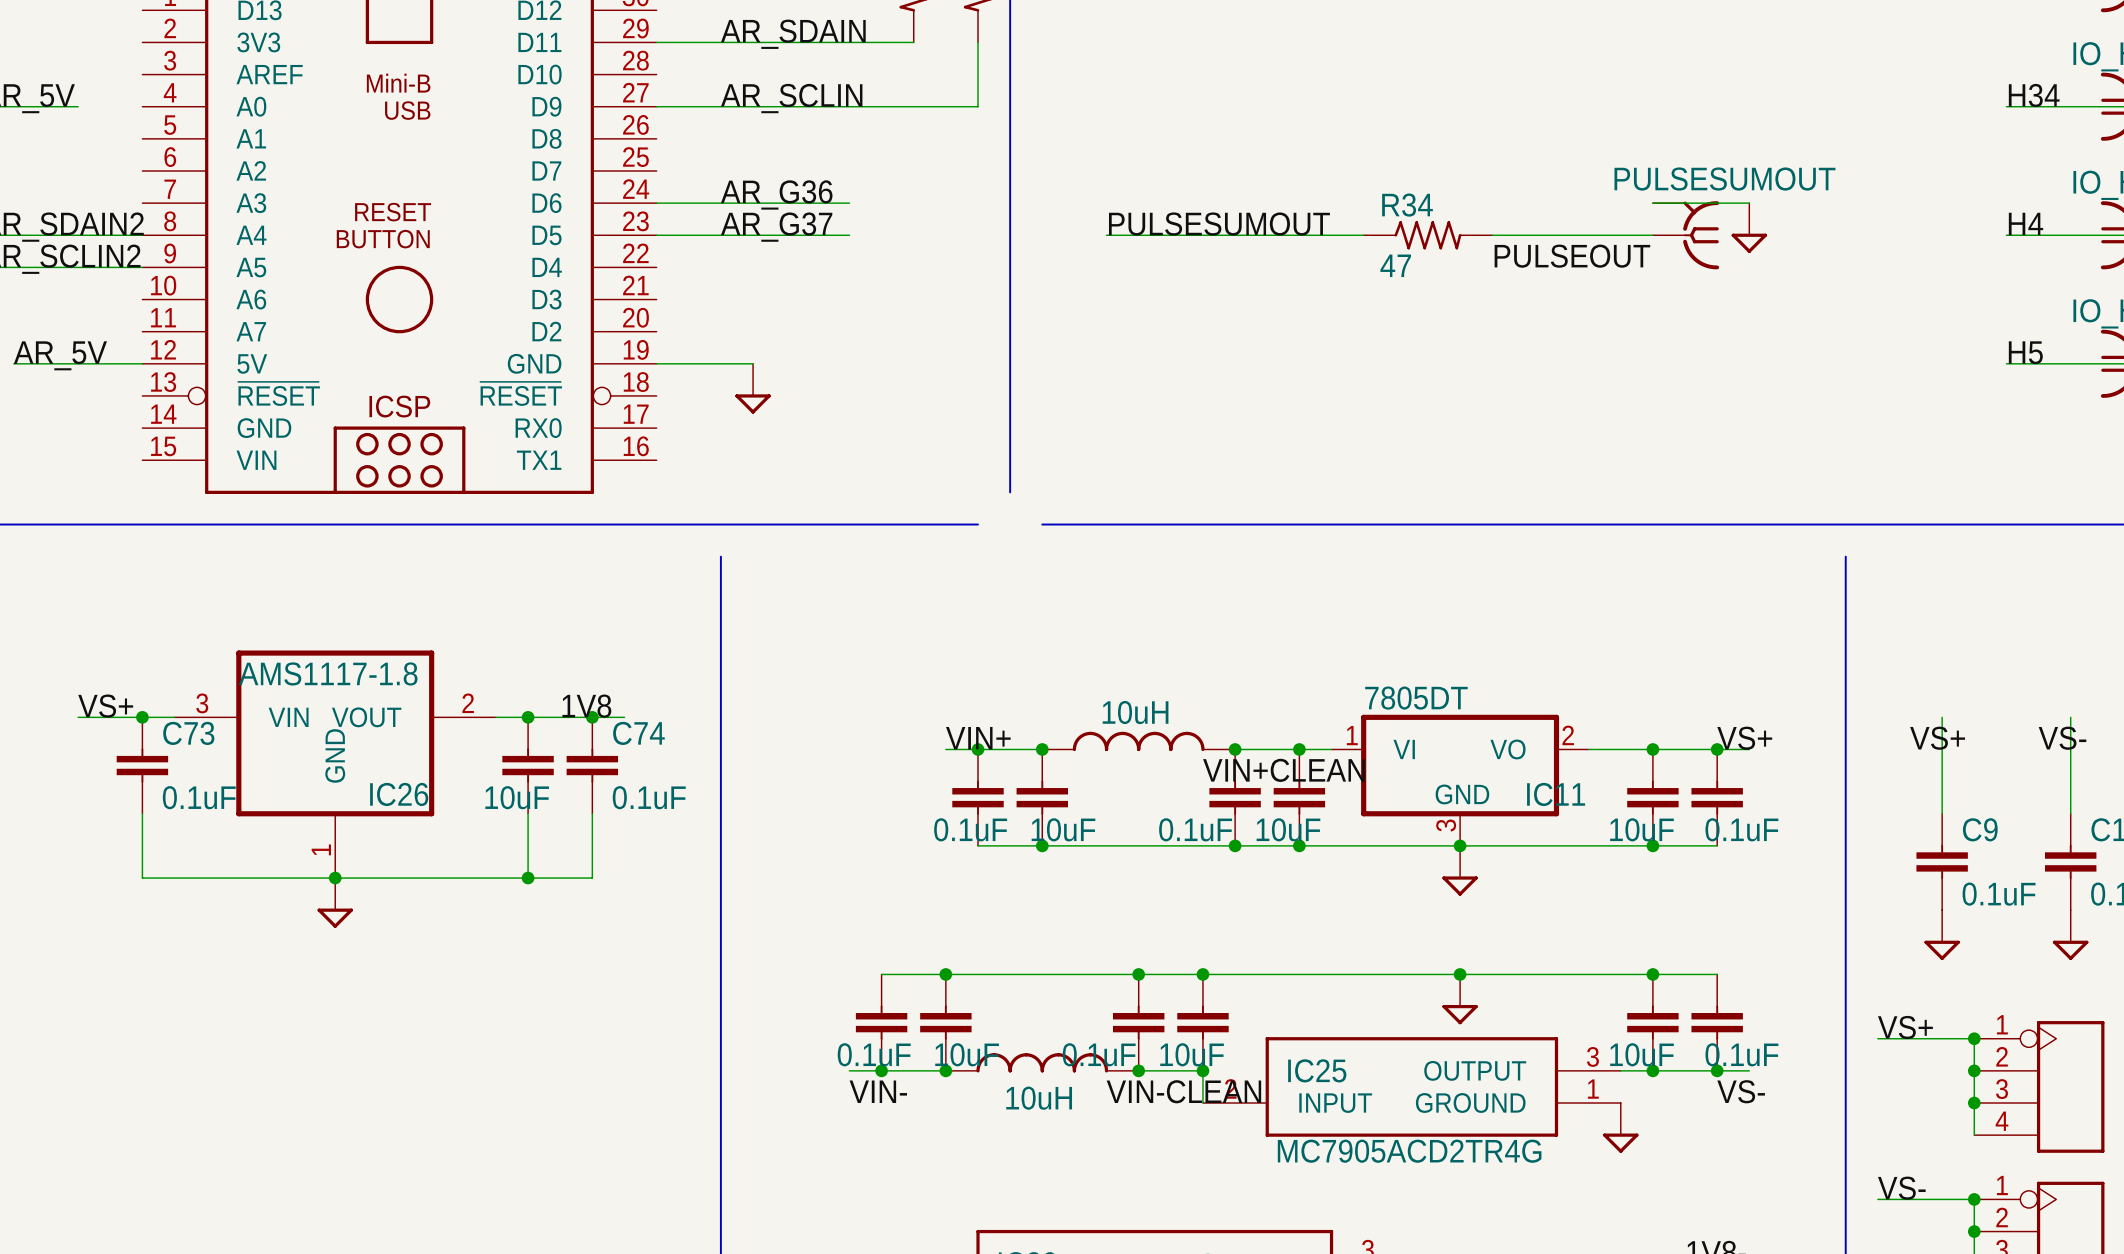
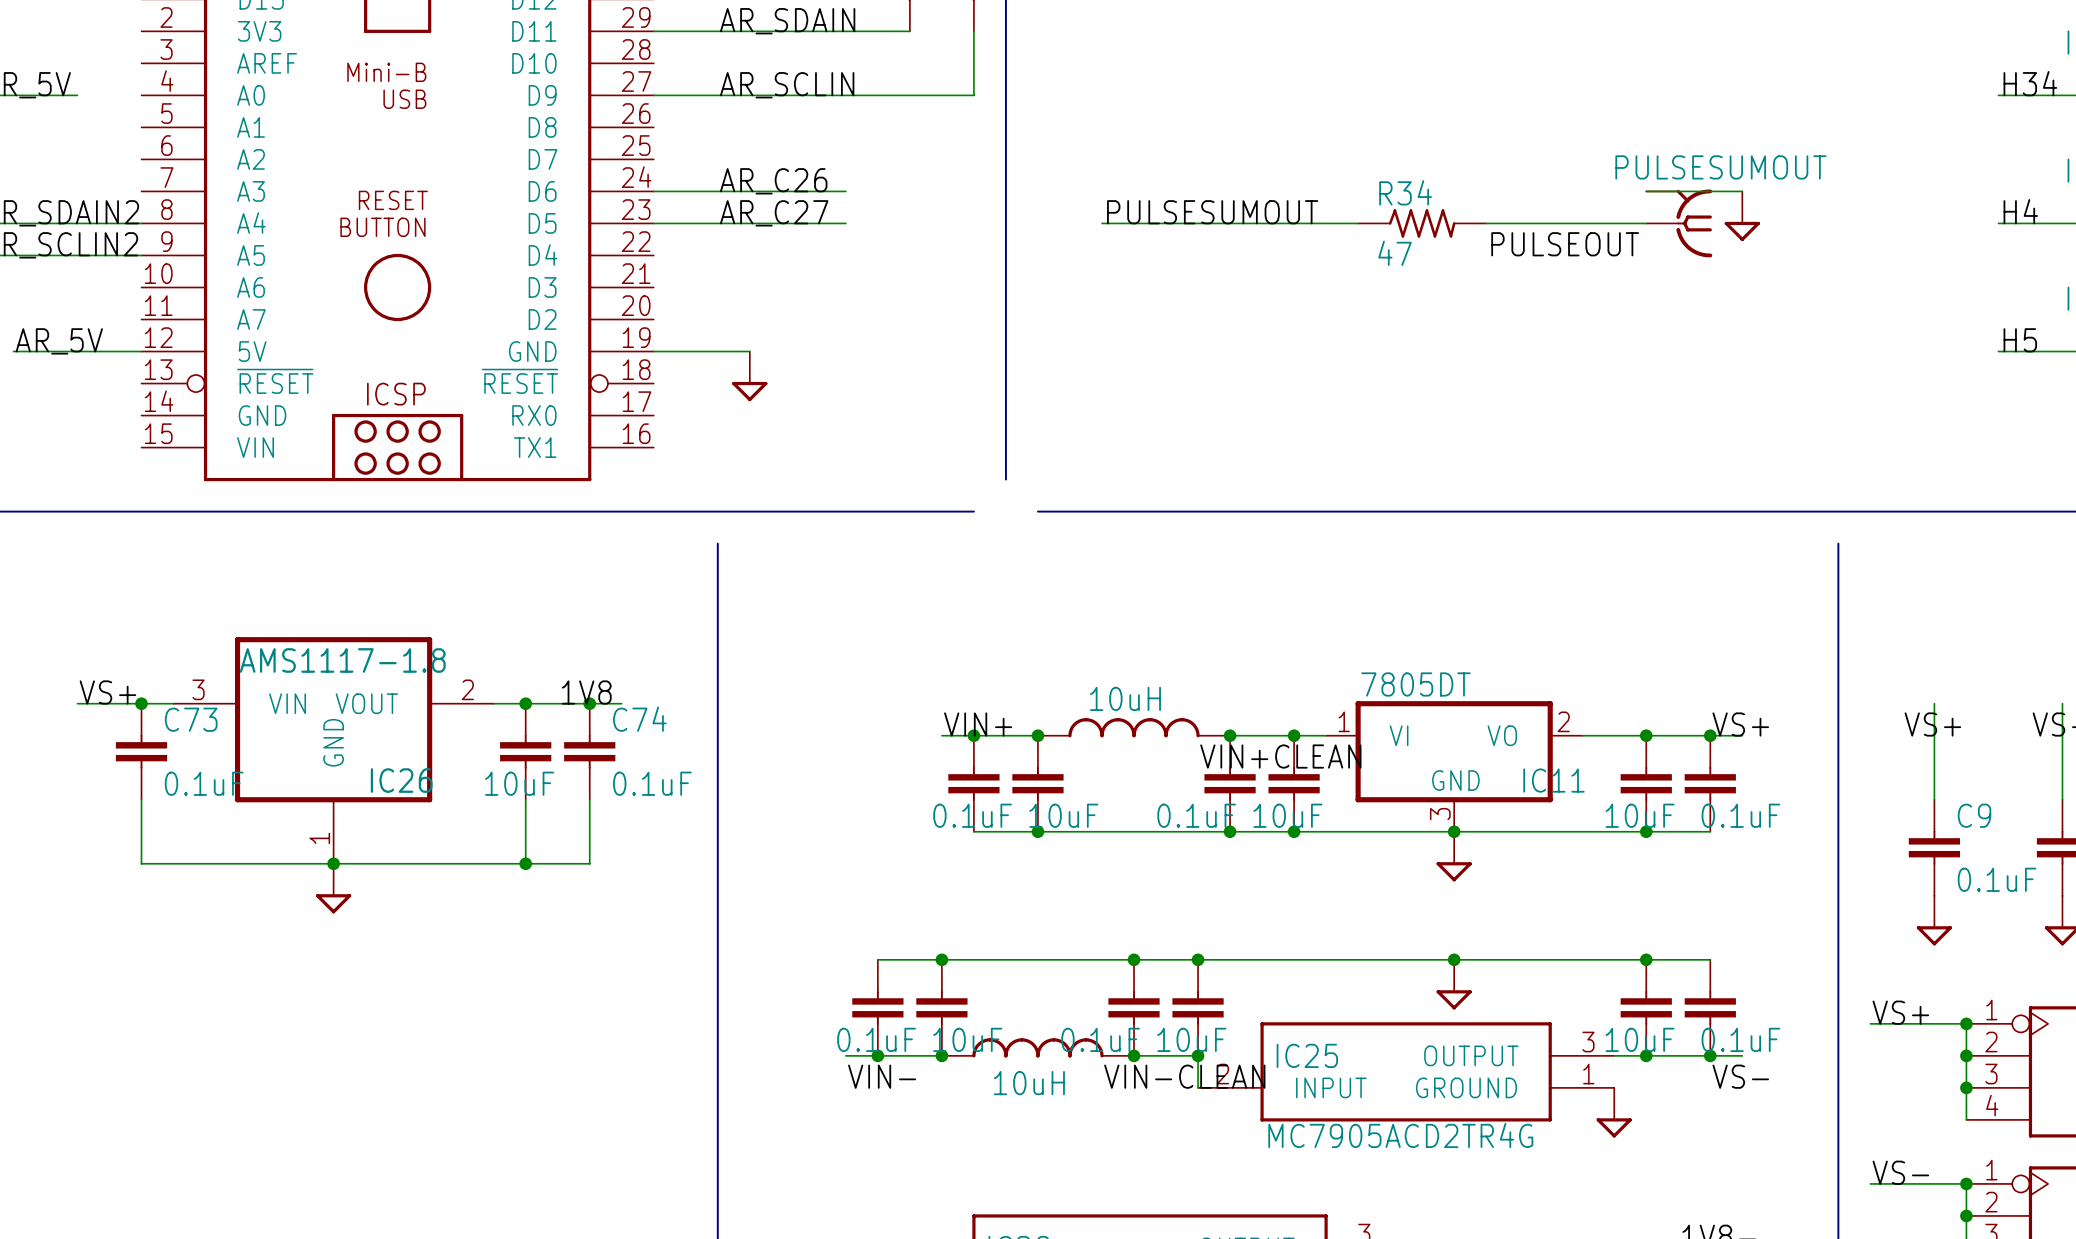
label: AR_G36 (776, 194) -> AR_C26 (773, 181)
label: AR_G37 (776, 227) -> AR_C27 (774, 213)

